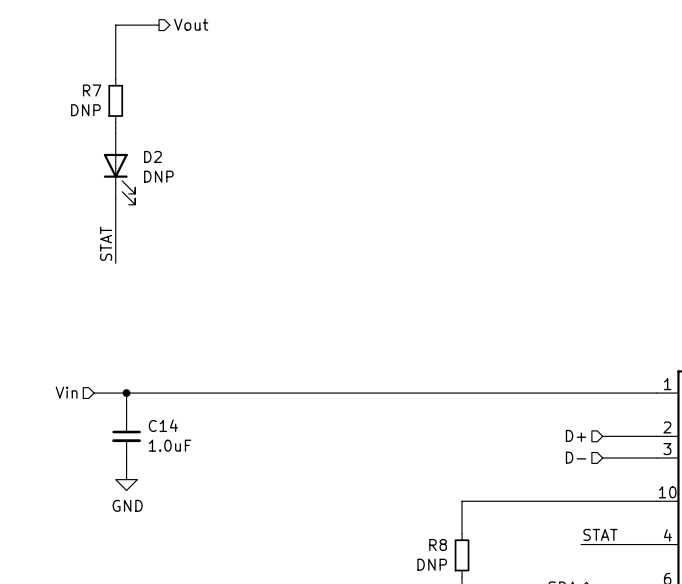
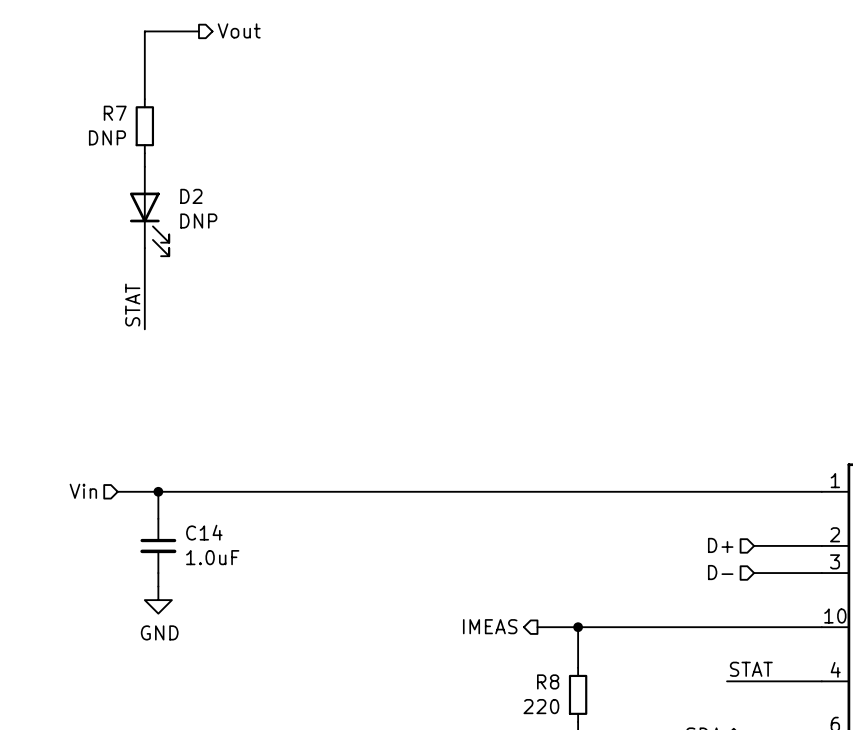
hierarchical label: none -> IMEAS (490, 626)
wire: none -> (537, 627) (578, 627)
junction: none -> (578, 627)
R8 value: DNP (432, 564) -> 220 (541, 706)

